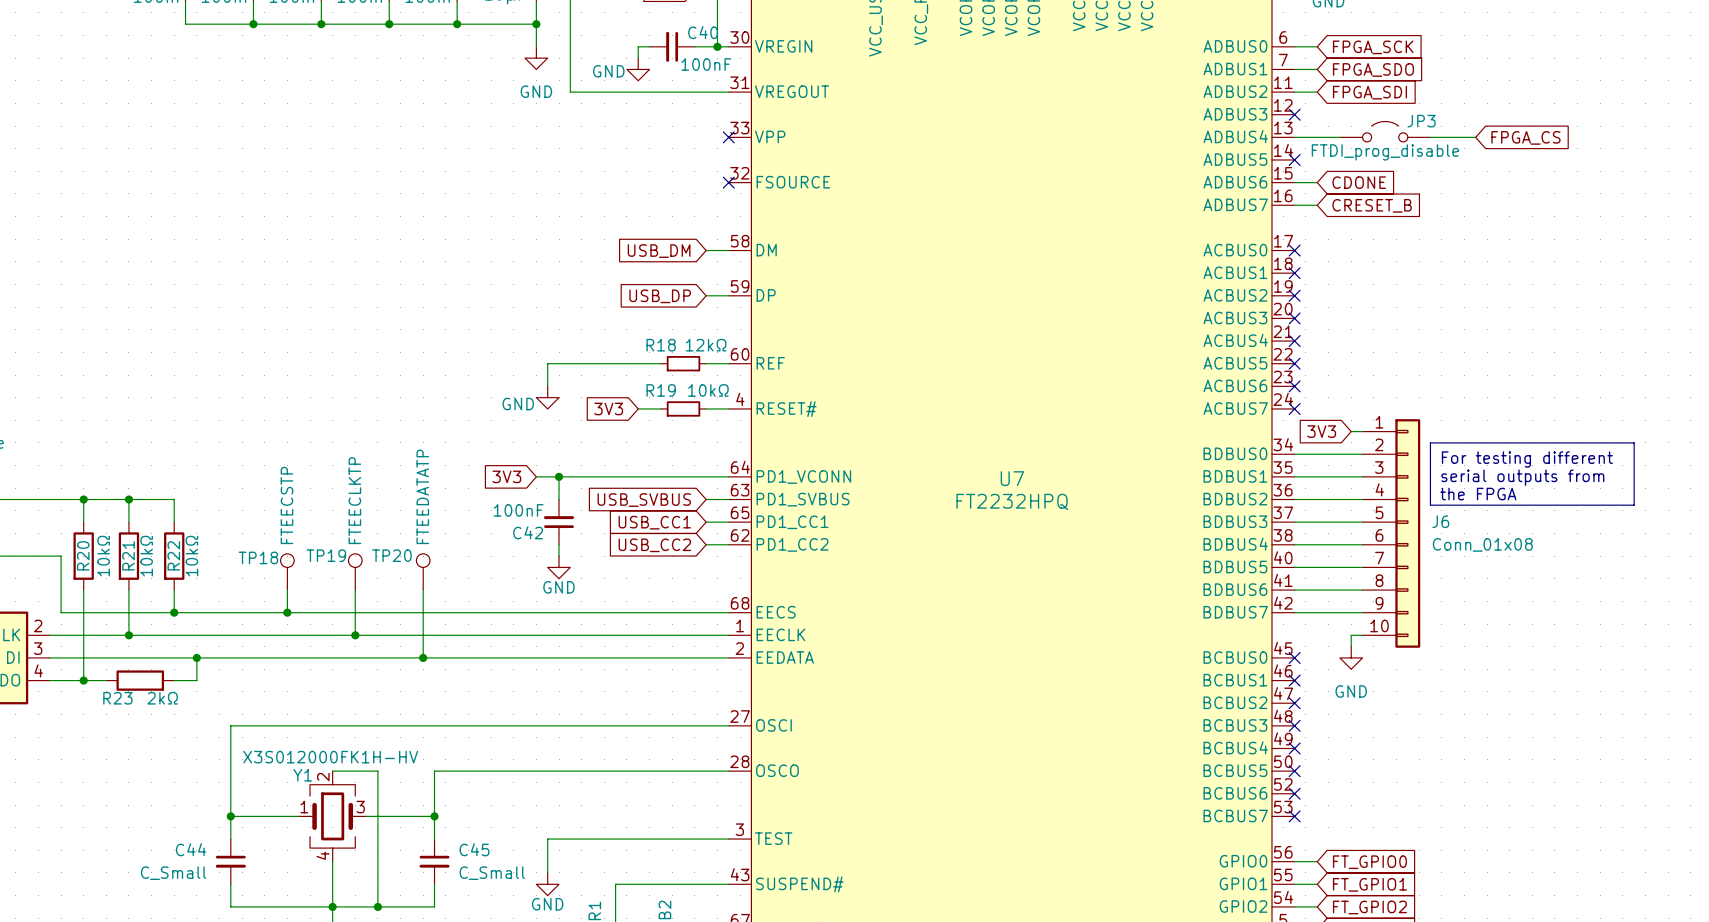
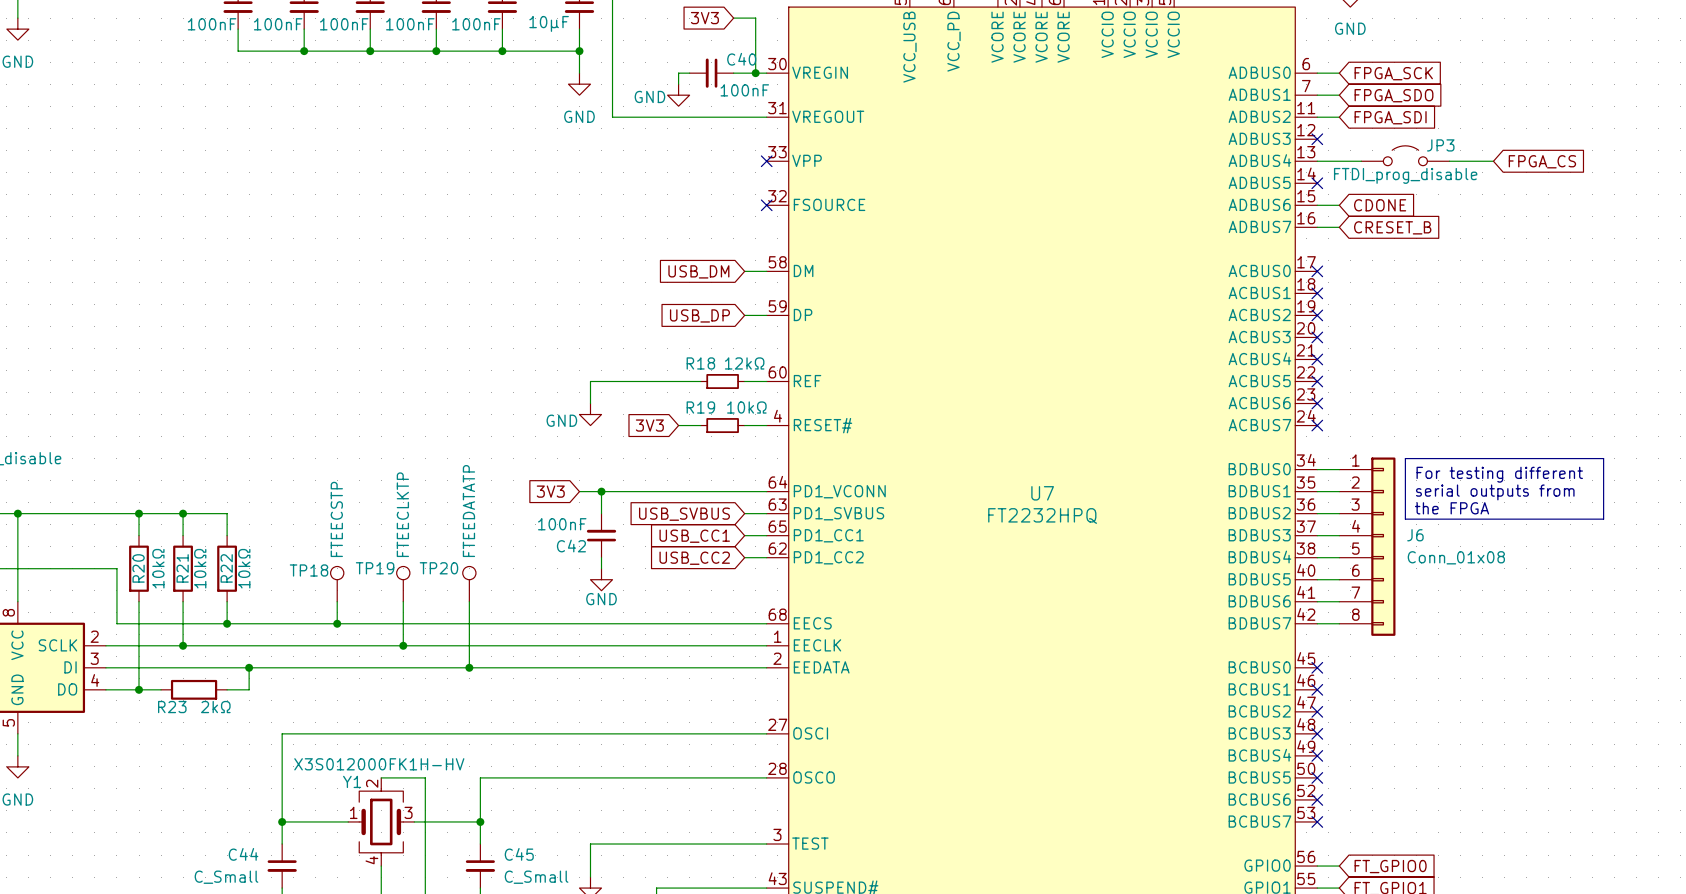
J6 symbol: [1362, 419, 1421, 648] -> [1339, 457, 1396, 636]
global label: 3V3 (1321, 431) -> none
wire: (1351, 431) (1362, 431) -> none
line: (1430, 442) (1430, 505) -> (1449, 458) (1405, 458) (1405, 519) (1449, 519)
line: (1588, 442) (1634, 442) (1634, 505) (1588, 505) -> (1603, 458) (1603, 519)
text position: For testing different (1527, 459) -> For testing different (1499, 474)
text position: serial outputs from (1522, 477) -> serial outputs from (1495, 492)
text position: the FPGA (1478, 494) -> the FPGA (1452, 508)
wire: (1362, 635) (1351, 635) (1351, 646) -> none
power symbol: GND (1351, 657) -> none

